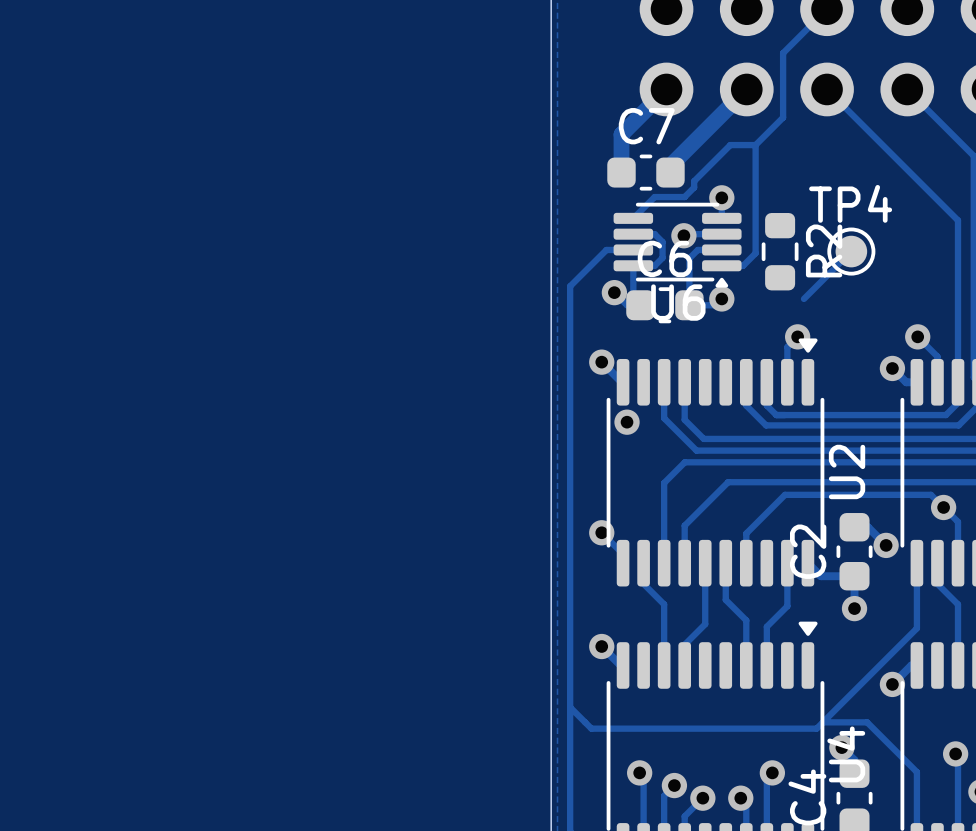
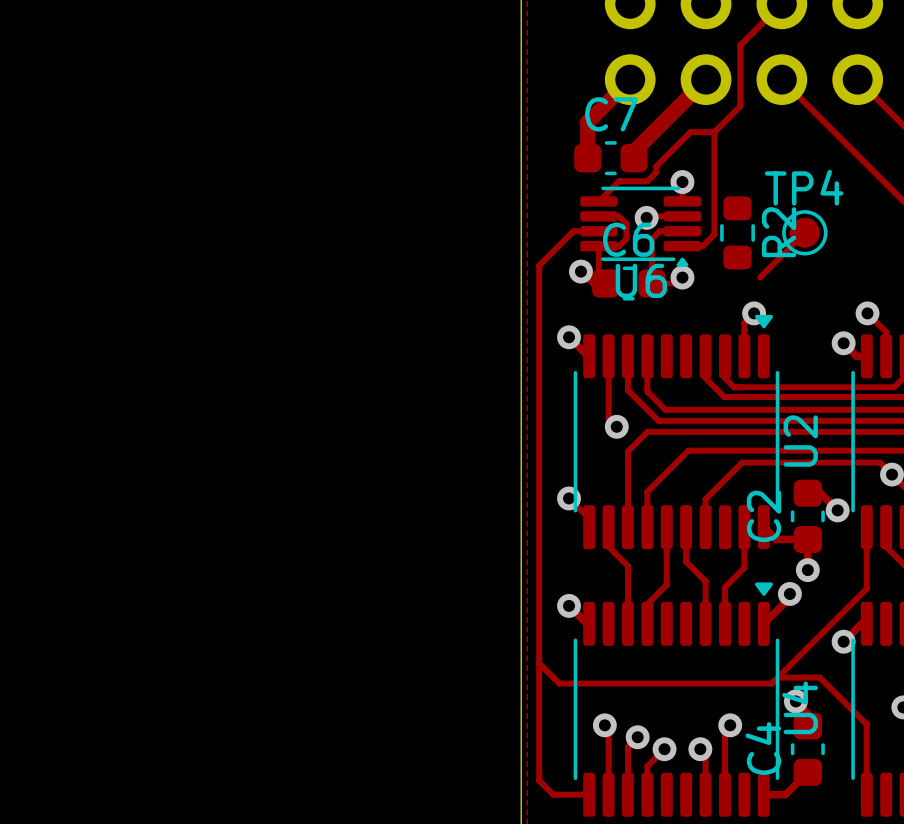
track: none -> (608, 356) (608, 418) (616, 426)
via position: (627, 422) -> (616, 426)
track: none -> (789, 593) (789, 597) (763, 623)
via: none -> (789, 593)

